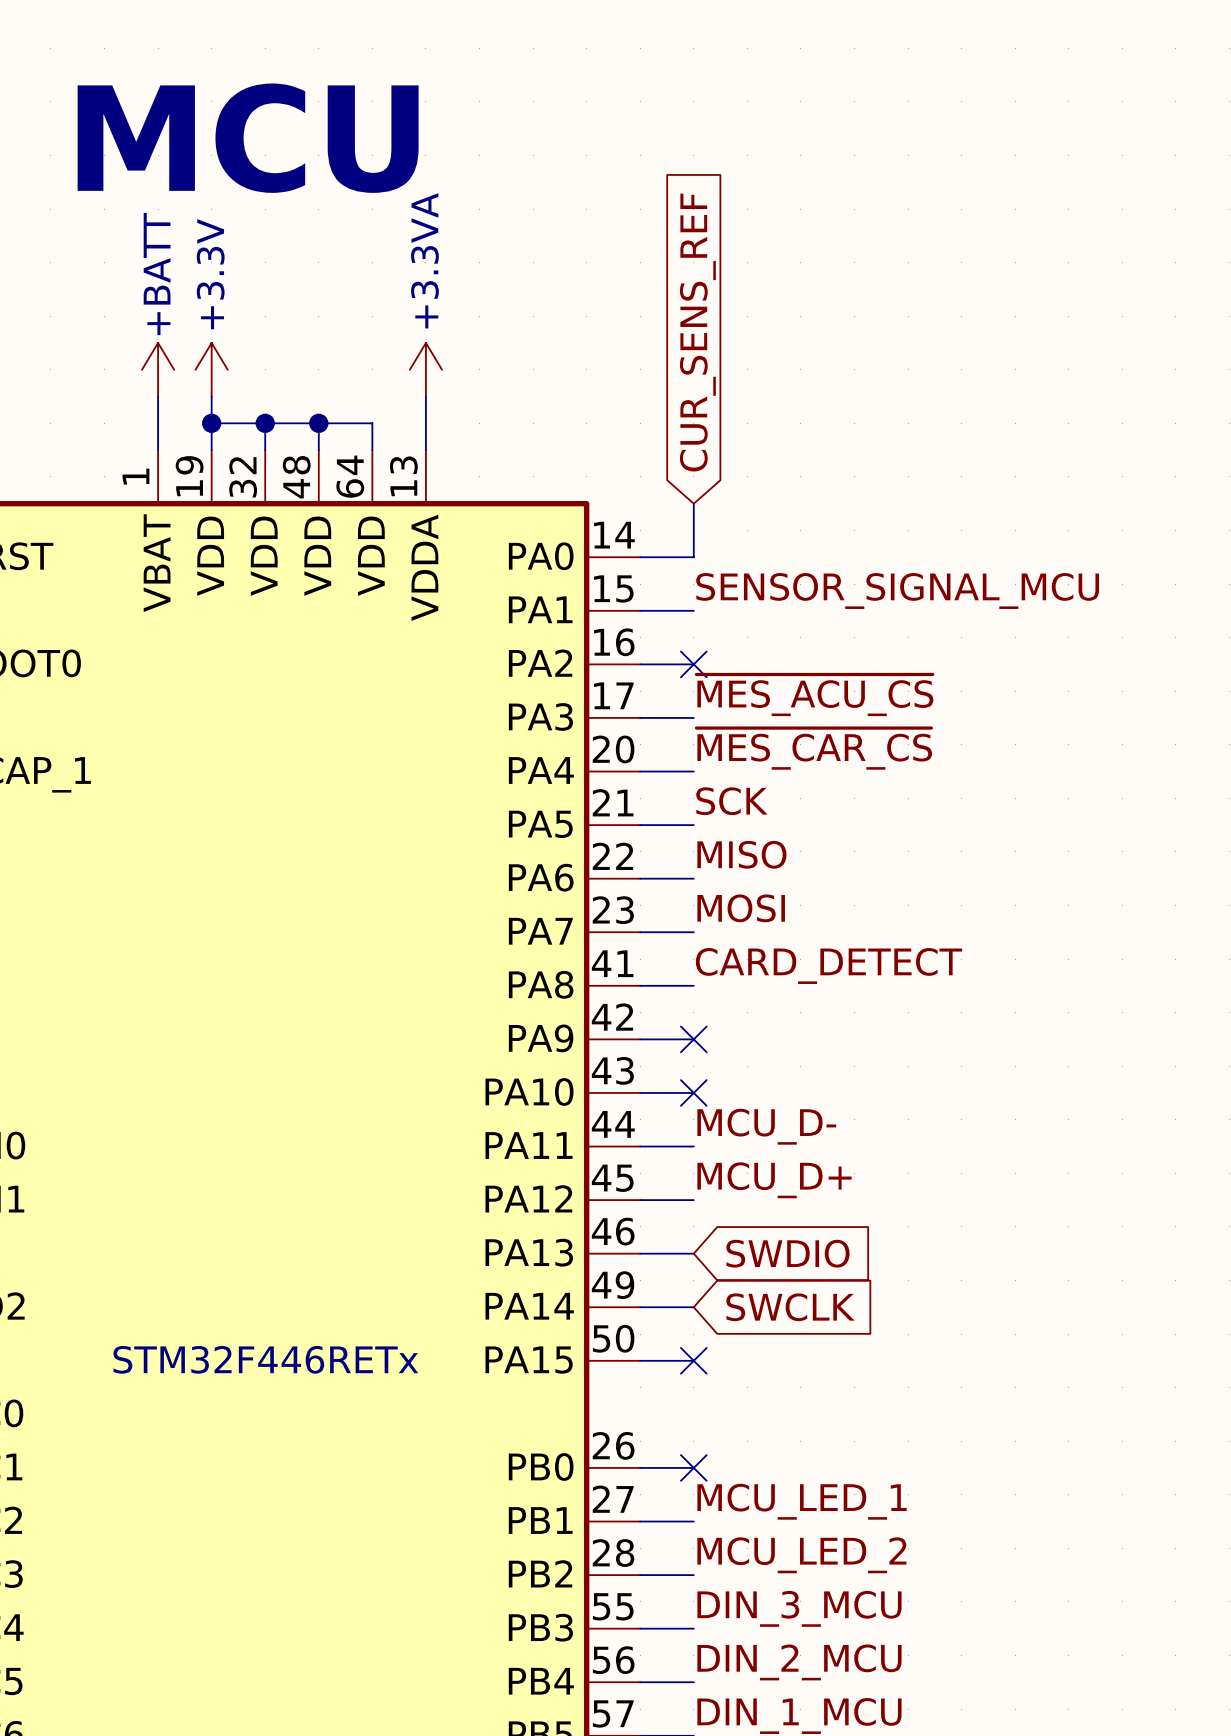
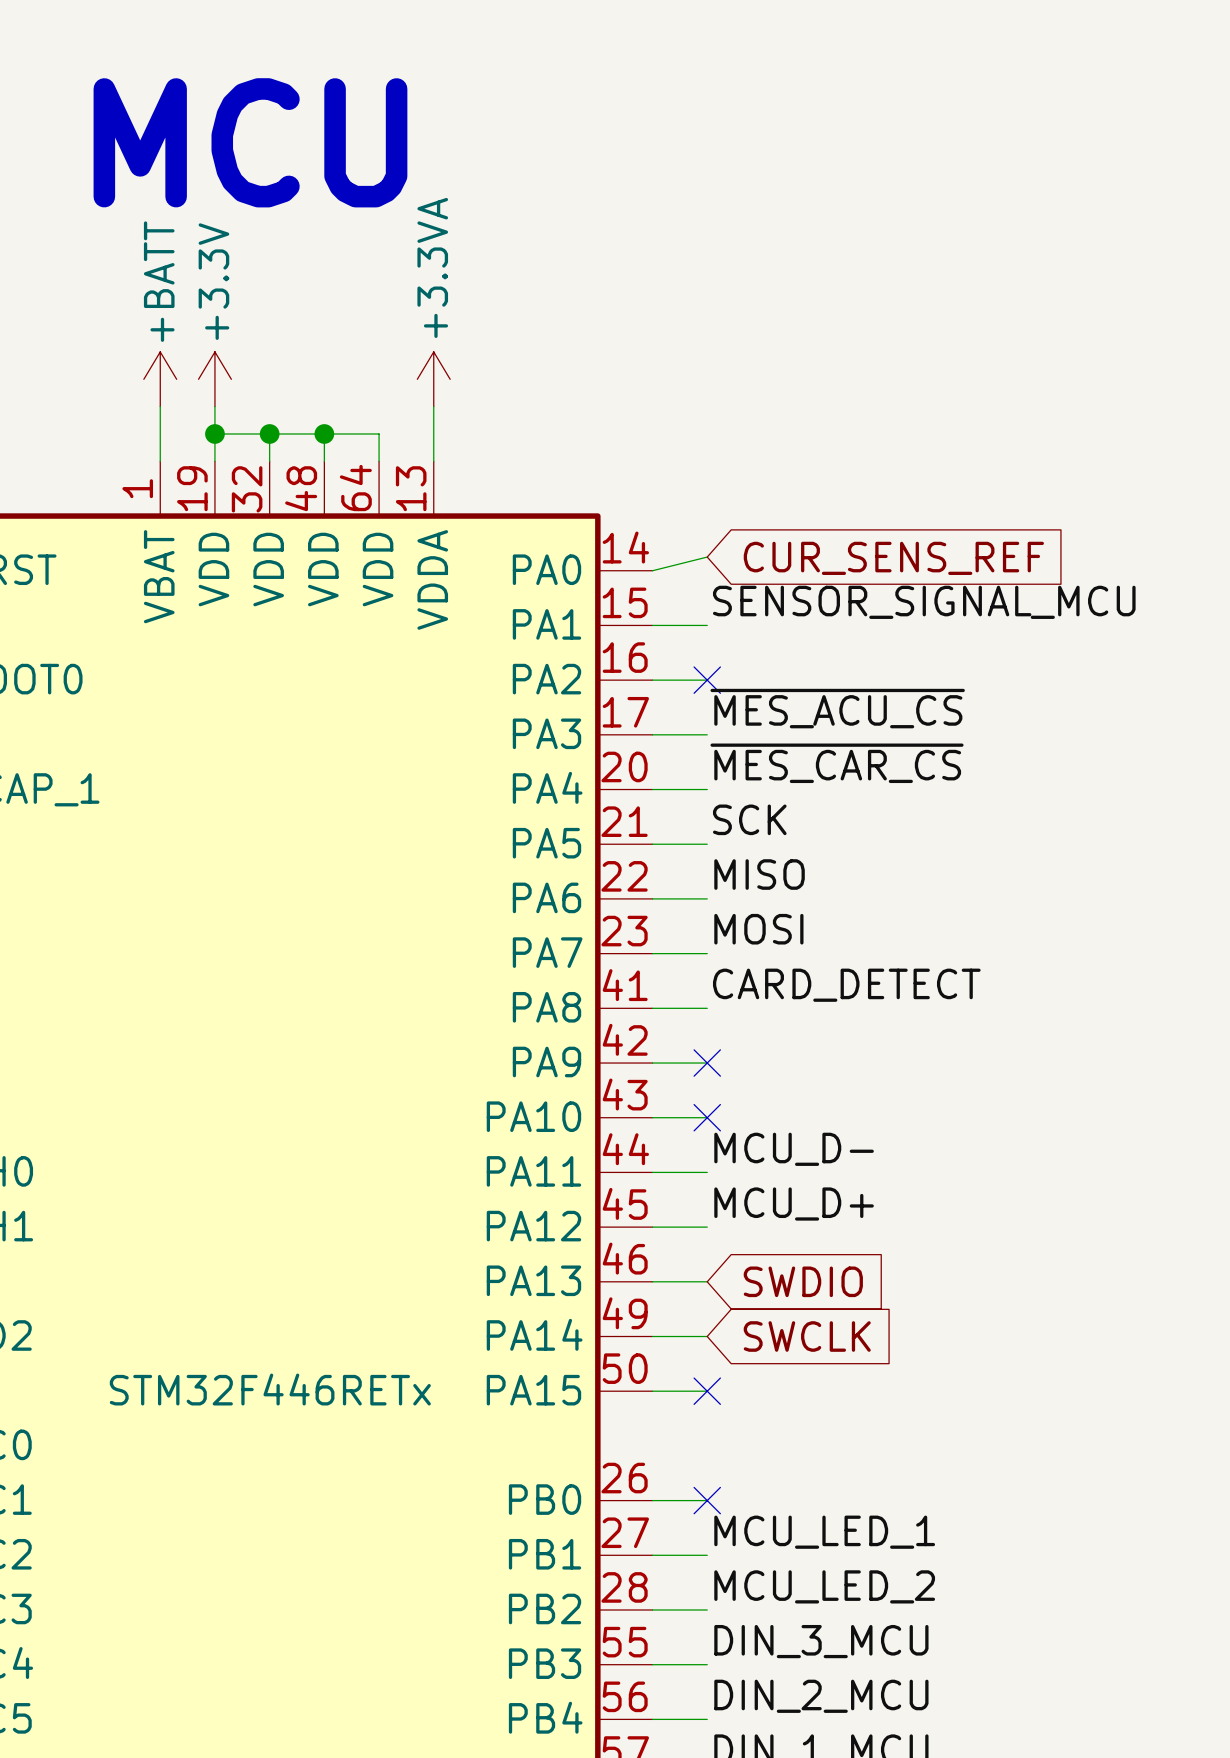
global label rotation: 0° (697, 332) -> 90° clockwise (893, 558)
wire: (693, 503) (693, 557) (640, 557) -> (707, 557) (652, 570)

